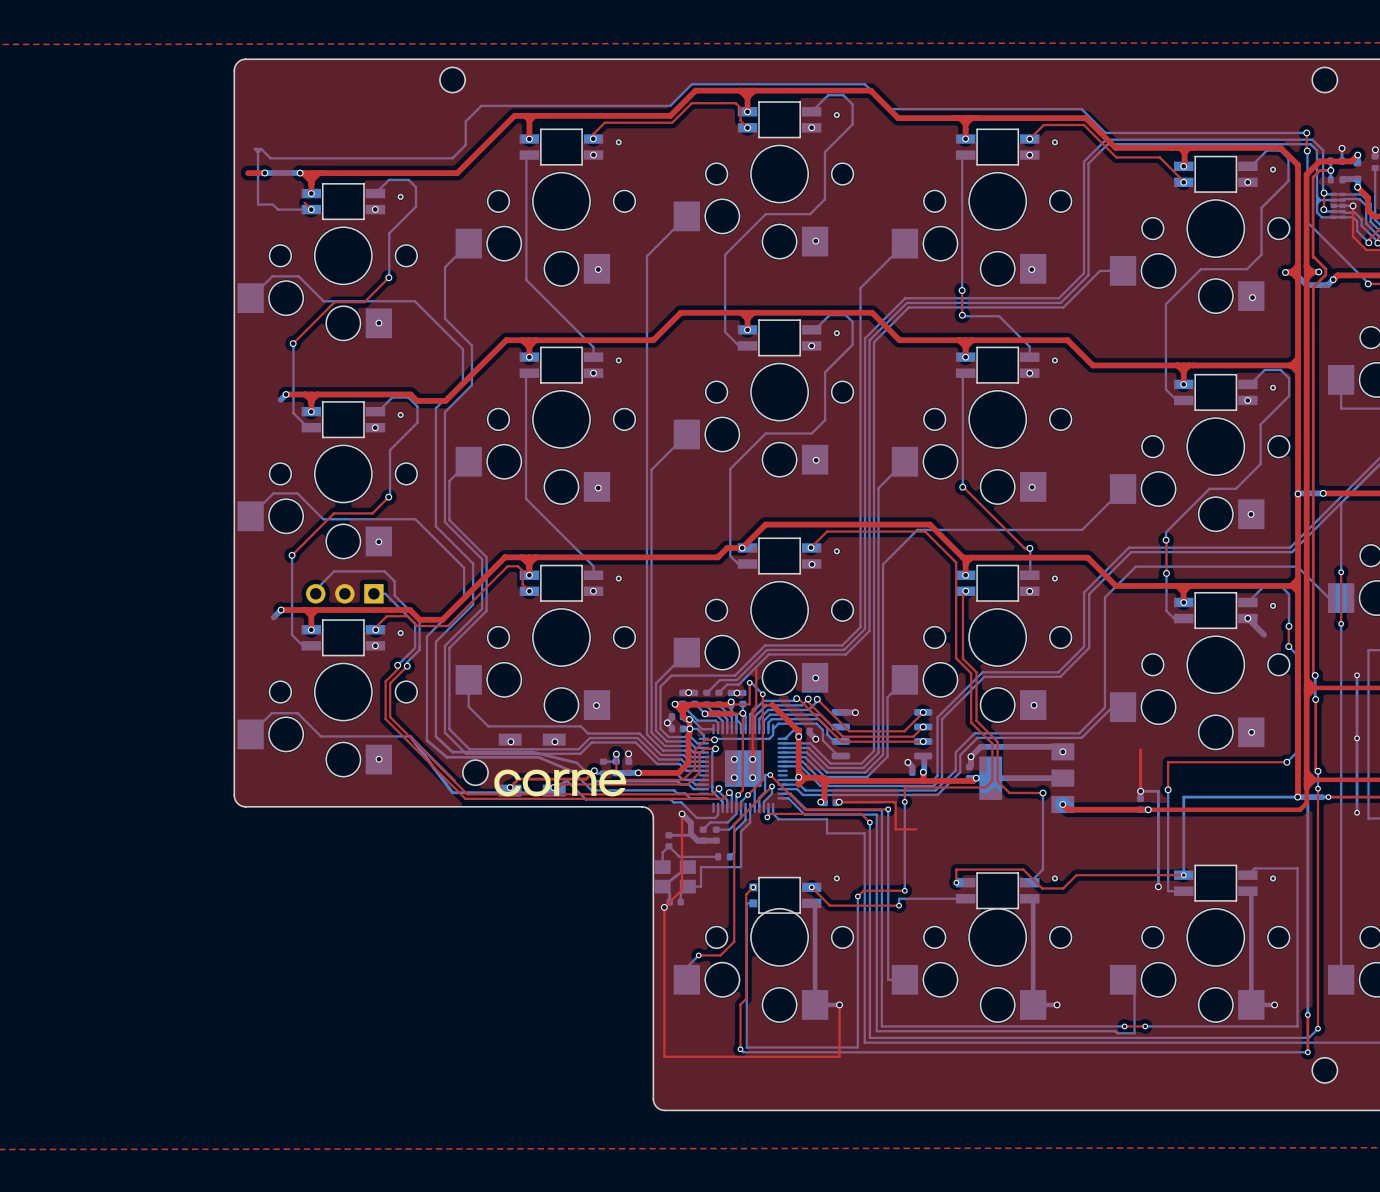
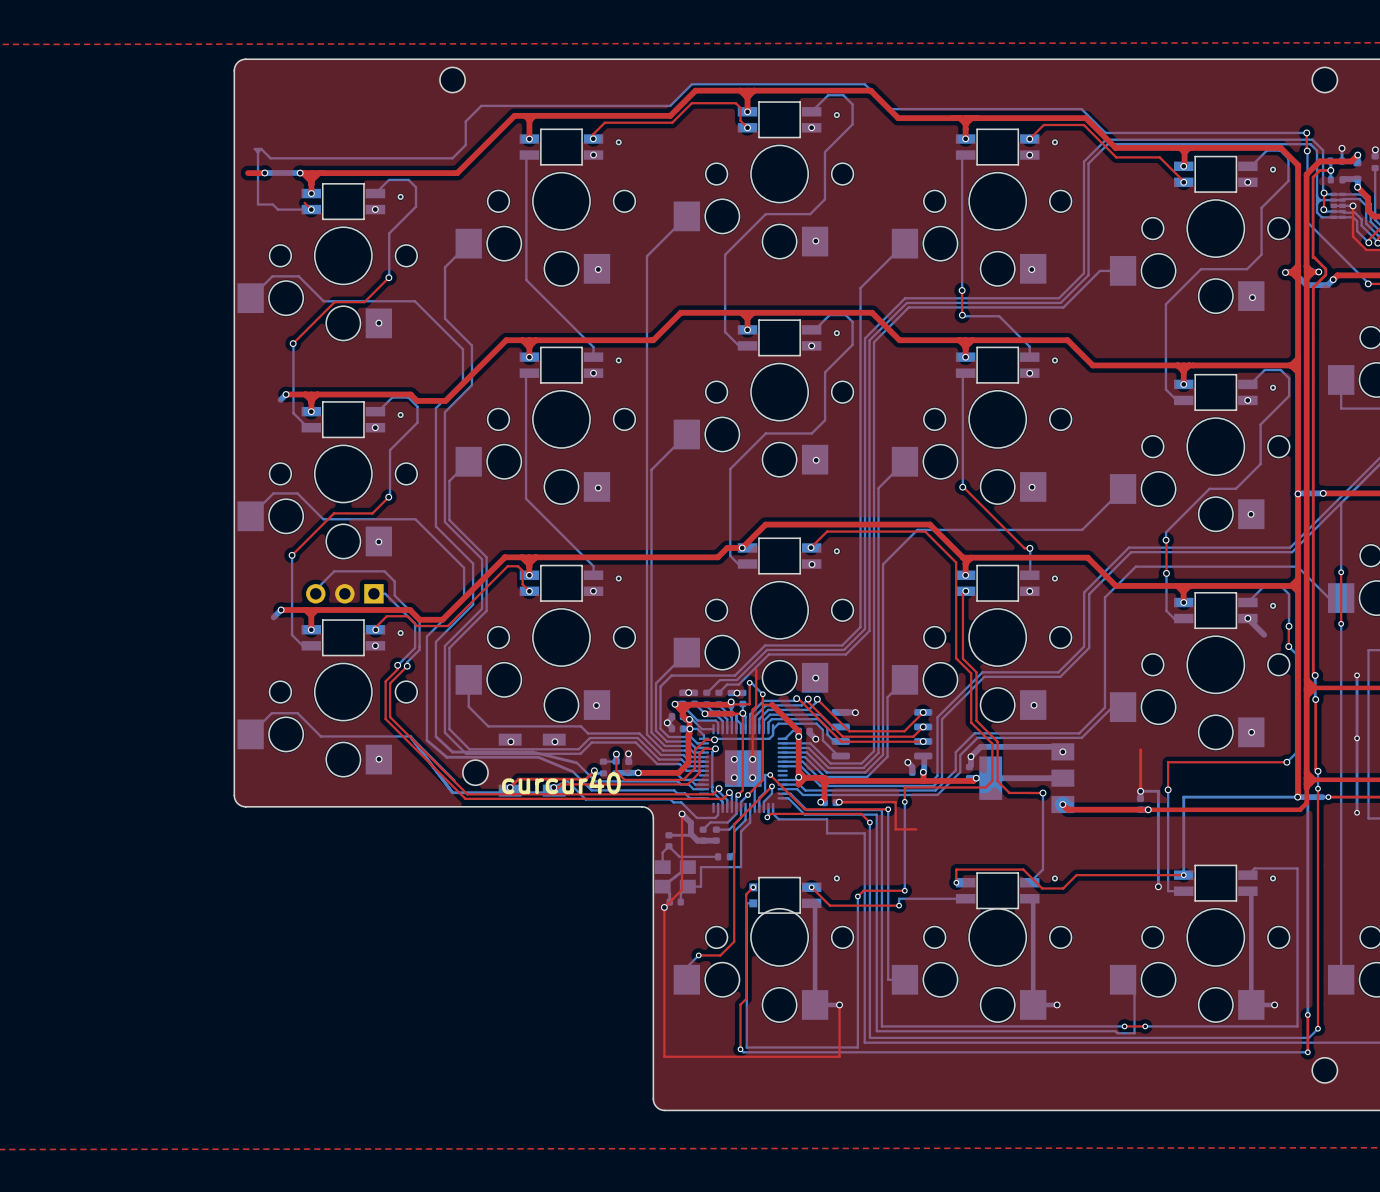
drawing: [494, 769, 627, 797] -> none
text: none -> curcur40 (561, 782)

